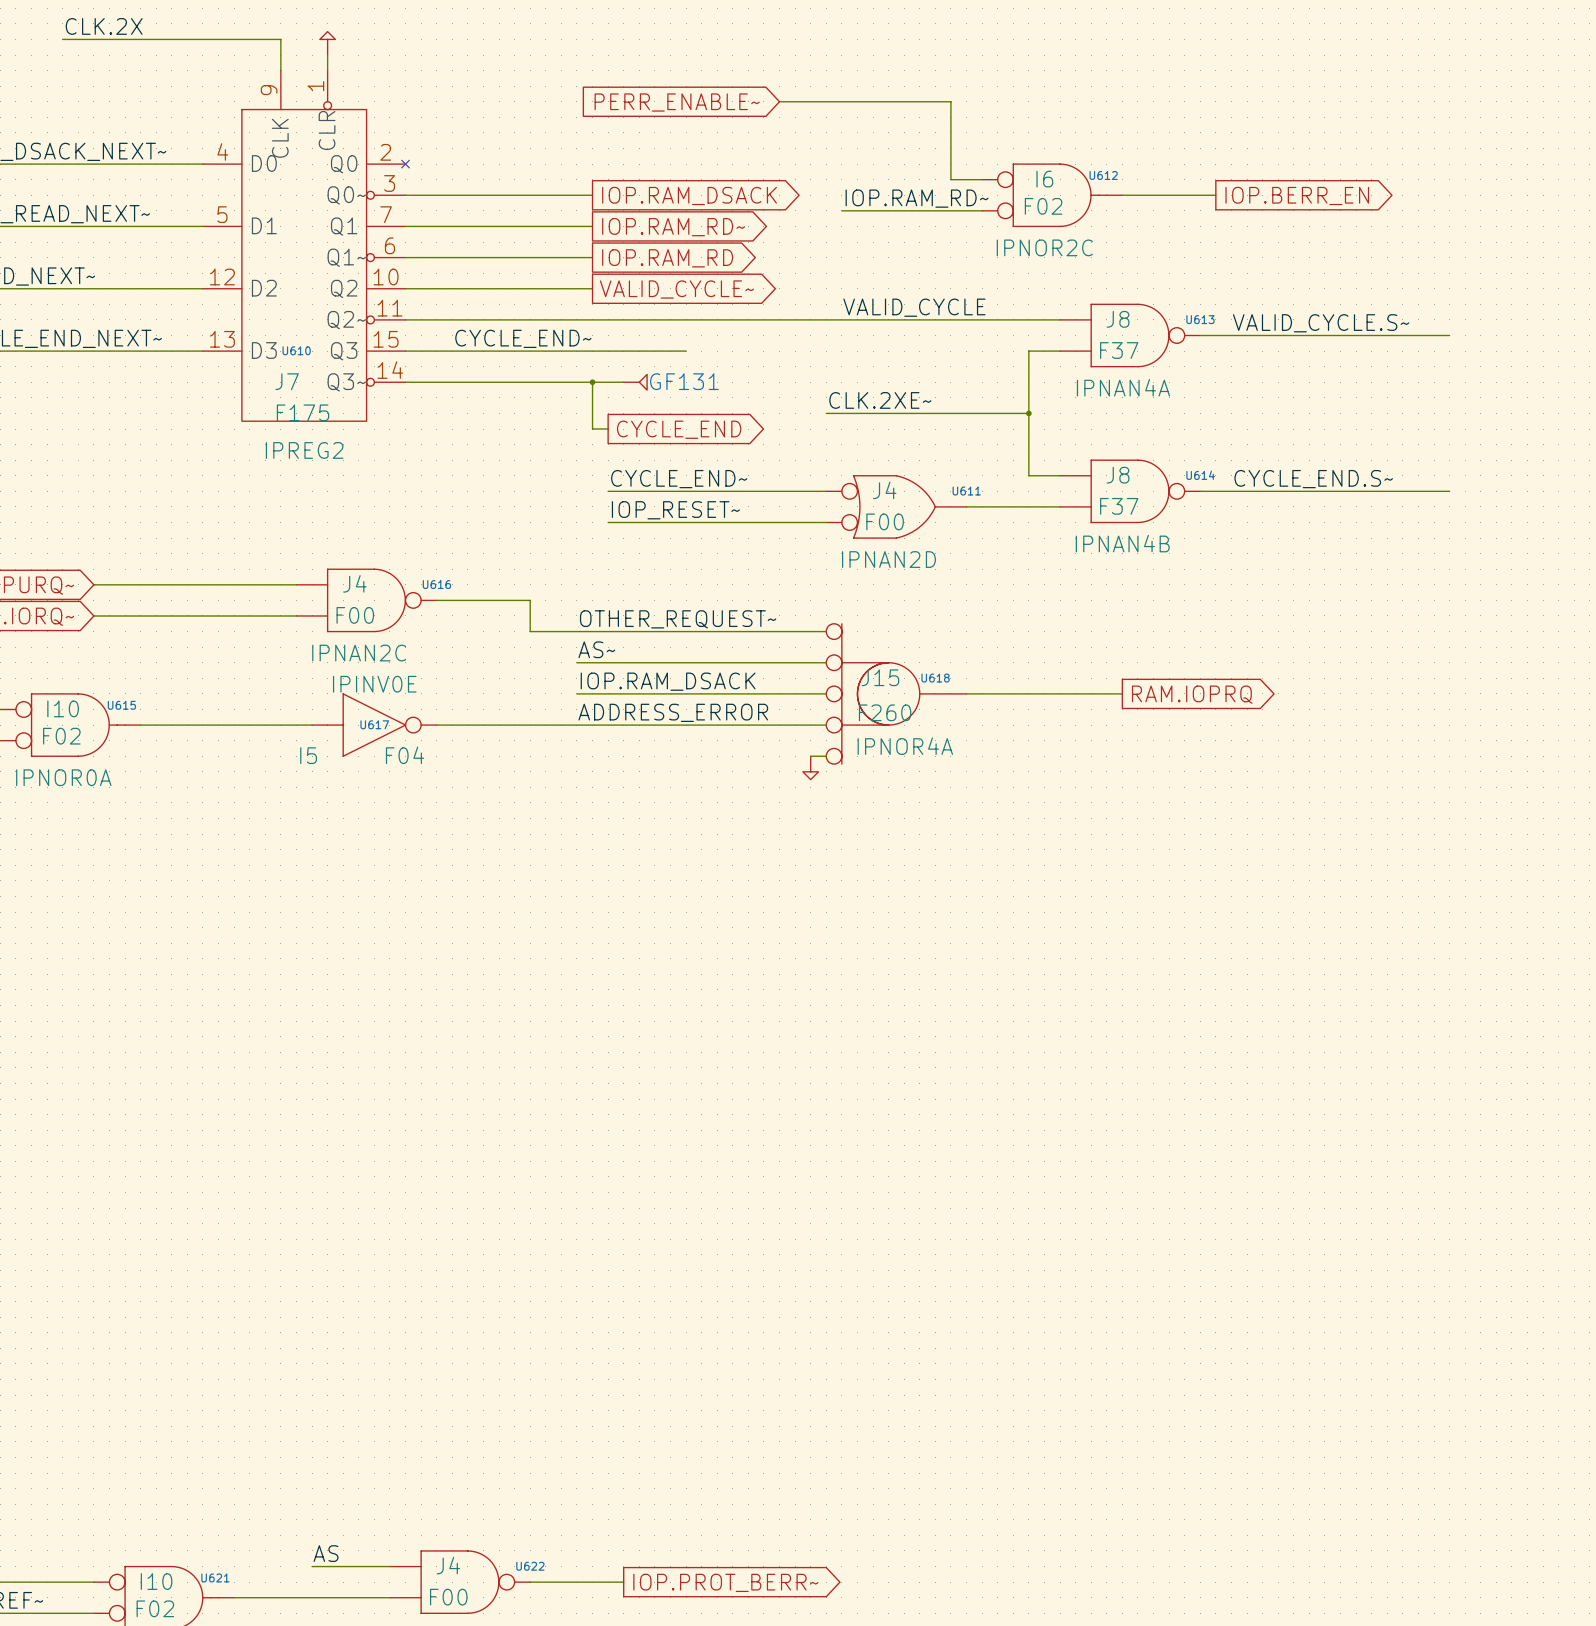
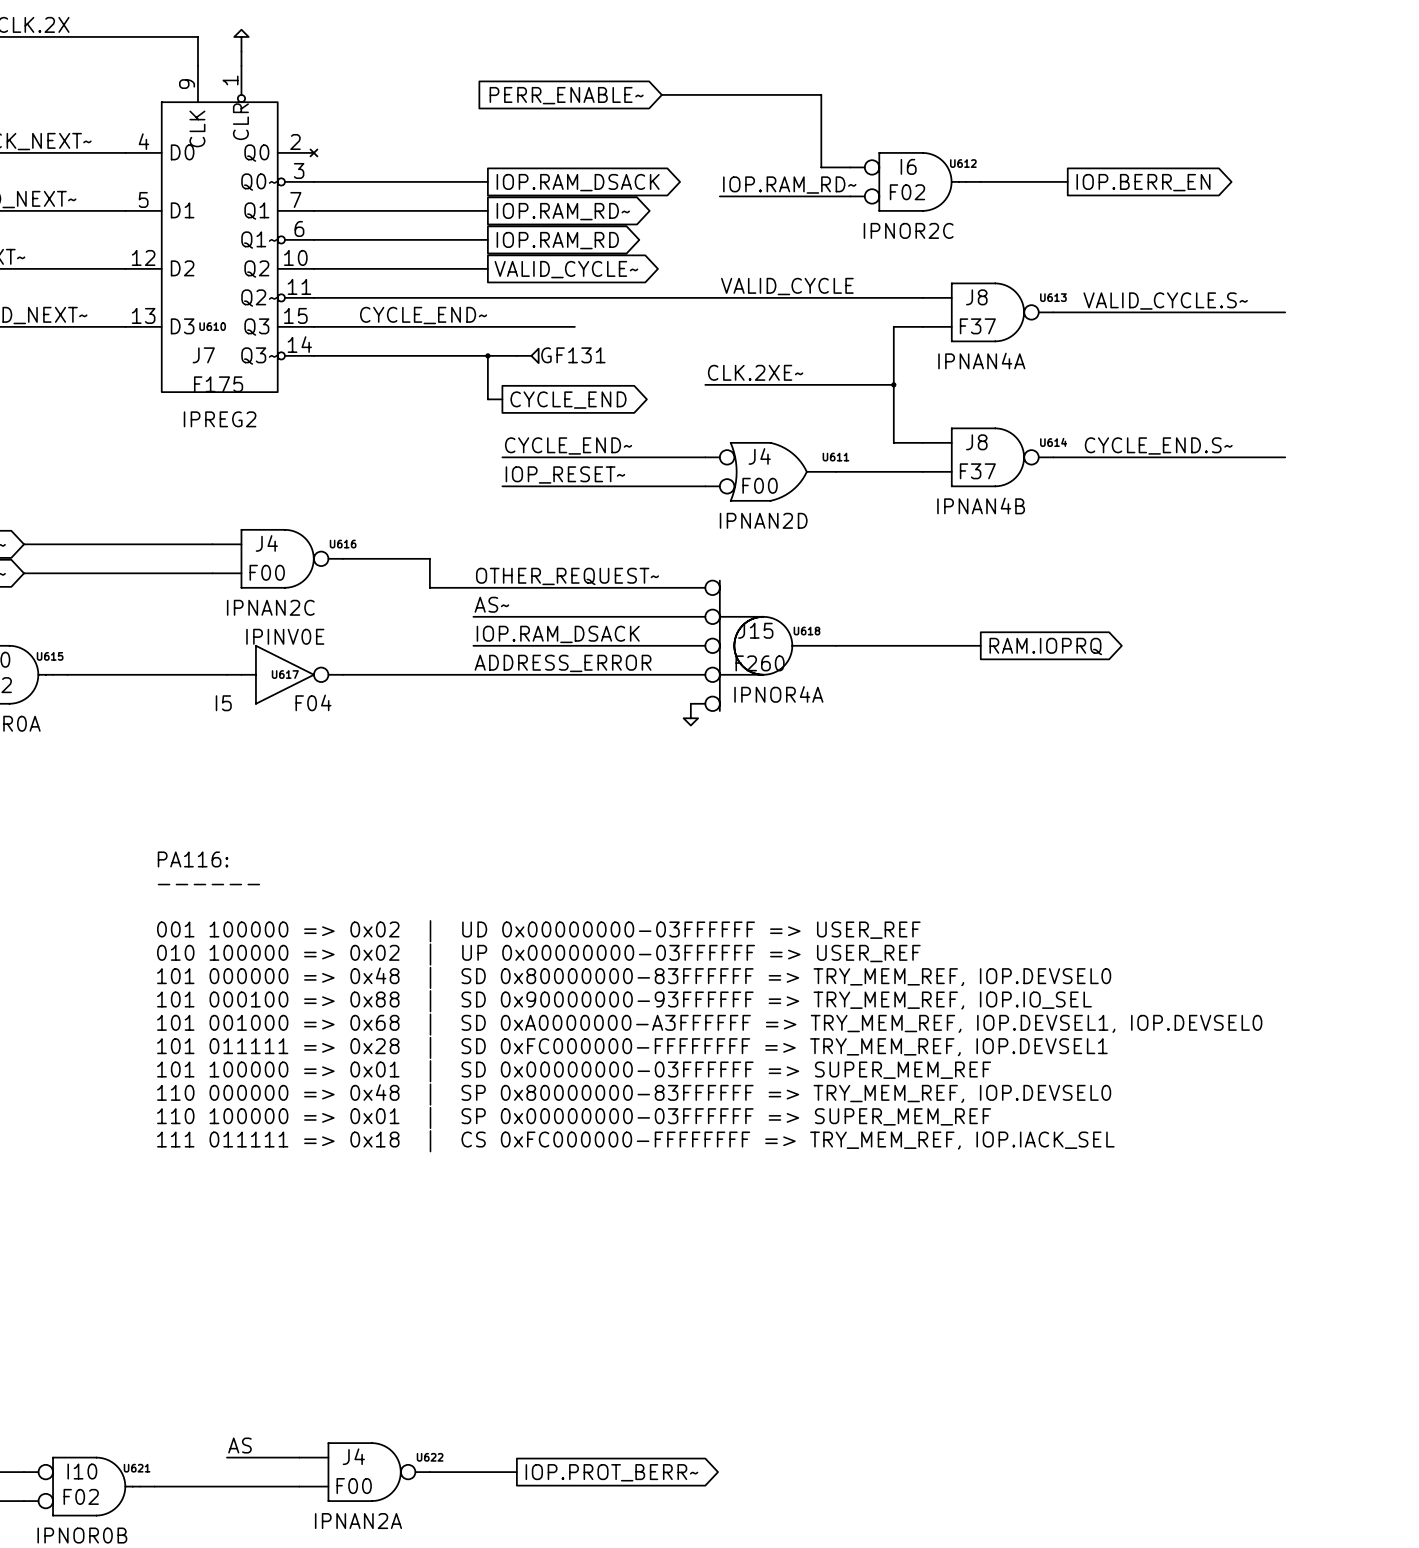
text: none -> PA116: (193, 859)
text: none -> ------ (208, 884)
text: none -> 001 100000 => 0x02 | UD 0x00000000-03FFFFFF => USER_REF (538, 931)
text: none -> 010 100000 => 0x02 | UP 0x00000000-03FFFFFF => USER_REF (538, 954)
text: none -> 101 000000 => 0x48 | SD 0x80000000-83FFFFFF => TRY_MEM_REF, IOP.DEVSEL0 (634, 977)
text: none -> 101 000100 => 0x88 | SD 0x90000000-93FFFFFF => TRY_MEM_REF, IOP.IO_SEL (624, 1001)
text: none -> 101 001000 => 0x68 | SD 0xA0000000-A3FFFFFF => TRY_MEM_REF, IOP.DEVSEL1, IOP.DEVSEL0 (709, 1024)
text: none -> 101 011111 => 0x28 | SD 0xFC000000-FFFFFFFF => TRY_MEM_REF, IOP.DEVSEL1 (632, 1047)
text: none -> 101 100000 => 0x01 | SD 0x00000000-03FFFFFF => SUPER_MEM_REF (574, 1071)
text: none -> 110 000000 => 0x48 | SP 0x80000000-83FFFFFF => TRY_MEM_REF, IOP.DEVSEL0 (634, 1094)
text: none -> 110 100000 => 0x01 | SP 0x00000000-03FFFFFF => SUPER_MEM_REF (574, 1117)
text: none -> 111 011111 => 0x18 | CS 0xFC000000-FFFFFFFF => TRY_MEM_REF, IOP.IACK_SEL (635, 1141)

